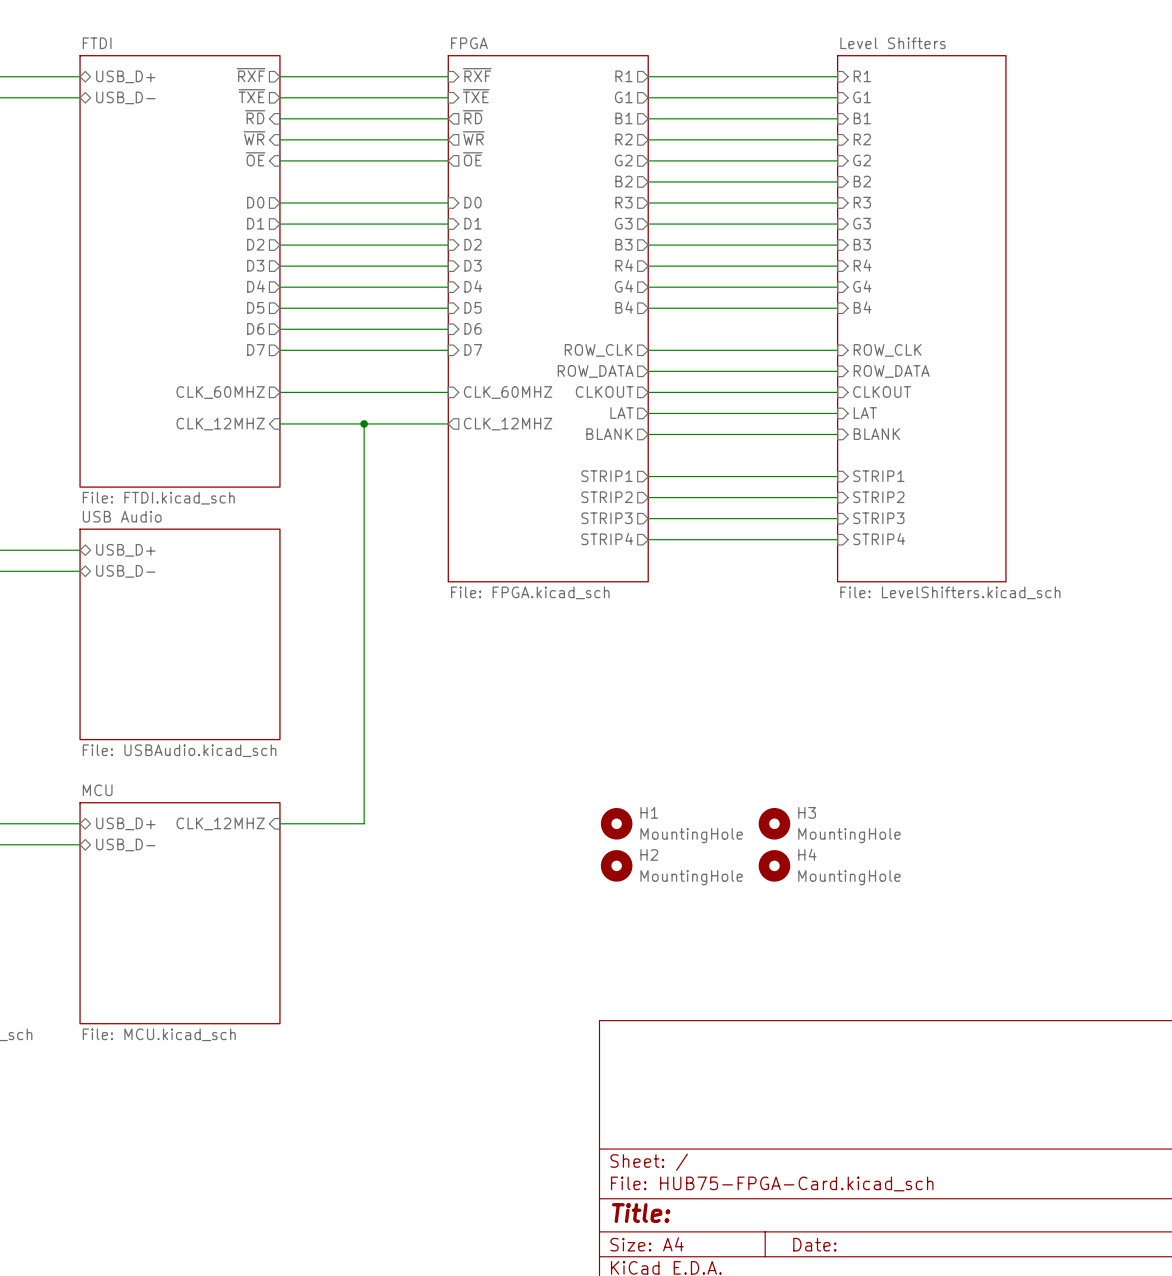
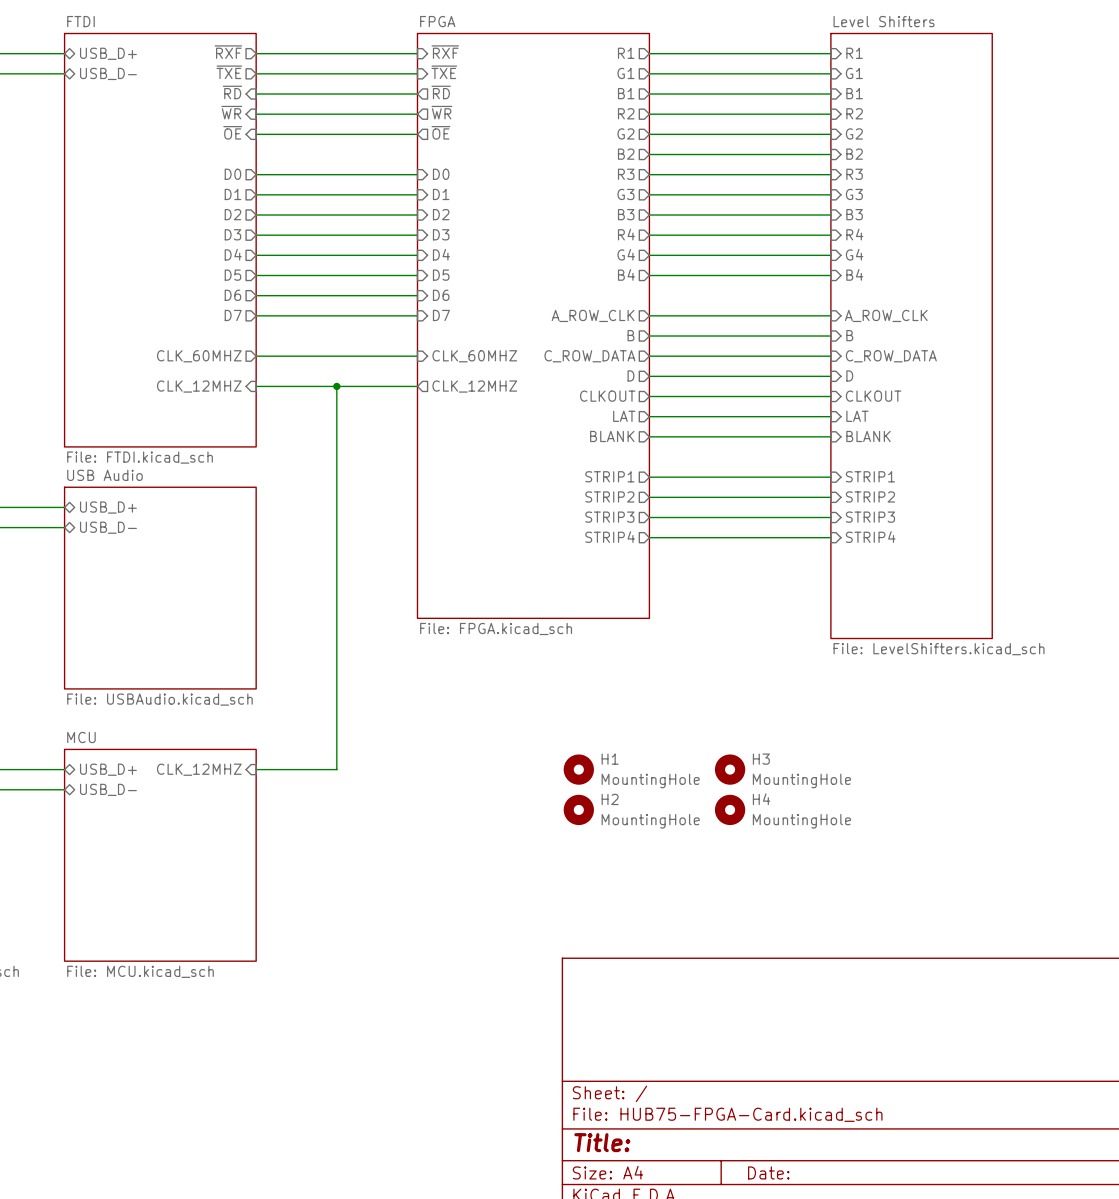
sheet pin position: R1 (624, 76) -> R1 (626, 53)
wire: (648, 76) (690, 76) -> (790, 53) (830, 53)
sheet pin position: R1 (862, 76) -> R1 (854, 53)
sheet pin position: G1 (623, 97) -> G1 (625, 73)
wire: (648, 97) (690, 97) -> (790, 73) (830, 73)
sheet pin position: G1 (862, 97) -> G1 (854, 73)
sheet pin position: B1 (624, 118) -> B1 (626, 93)
wire: (648, 118) (690, 118) -> (790, 94) (830, 94)
sheet pin position: B1 (862, 118) -> B1 (854, 93)
sheet pin position: R2 (624, 139) -> R2 (626, 113)
wire: (648, 139) (690, 139) -> (790, 114) (830, 114)
sheet pin position: R2 (862, 139) -> R2 (854, 113)
sheet pin position: G2 (623, 160) -> G2 (625, 133)
wire: (648, 160) (690, 160) -> (790, 134) (830, 134)
sheet pin position: G2 (862, 160) -> G2 (854, 133)
sheet pin position: B2 (624, 181) -> B2 (626, 154)
wire: (648, 181) (690, 181) -> (790, 154) (830, 154)
sheet pin position: B2 (862, 181) -> B2 (854, 154)
sheet pin position: R3 (624, 202) -> R3 (626, 174)
sheet pin position: R3 (862, 202) -> R3 (854, 174)
wire: (648, 203) (690, 203) -> (790, 174) (830, 174)
sheet pin position: G3 (623, 223) -> G3 (625, 194)
sheet pin position: G3 (862, 223) -> G3 (854, 194)
wire: (648, 224) (690, 224) -> (790, 194) (830, 194)
sheet pin position: B3 (624, 244) -> B3 (626, 214)
sheet pin position: B3 (862, 244) -> B3 (854, 214)
wire: (648, 245) (690, 245) -> (790, 215) (830, 215)
sheet pin position: R4 (624, 265) -> R4 (626, 234)
sheet pin position: R4 (862, 265) -> R4 (854, 234)
wire: (648, 266) (690, 266) -> (790, 235) (830, 235)
sheet pin position: G4 (624, 286) -> G4 (626, 254)
sheet pin position: G4 (862, 286) -> G4 (854, 254)
wire: (648, 287) (690, 287) -> (790, 255) (830, 255)
sheet pin position: B4 (624, 307) -> B4 (626, 274)
sheet pin position: B4 (862, 307) -> B4 (854, 274)
wire: (648, 308) (690, 308) -> (790, 275) (830, 275)
sheet FPGA: File: FPGA.kicad_sch (548, 318) -> none
sheet Level Shifters: File: LevelShifters.kicad_sch (921, 318) -> none
sheet pin: ROW_CLK (598, 350) -> A_ROW_CLK (593, 315)
wire: (648, 350) (690, 350) -> (790, 315) (830, 315)
sheet pin: ROW_CLK (887, 350) -> A_ROW_CLK (886, 315)
sheet FPGA: none -> File: FPGA.kicad_sch (533, 325)
sheet pin: none -> B (631, 335)
sheet pin: none -> B (849, 335)
sheet pin: ROW_DATA (595, 371) -> C_ROW_DATA (589, 356)
wire: (648, 371) (690, 371) -> (790, 336) (830, 336)
sheet pin: ROW_DATA (891, 371) -> C_ROW_DATA (891, 356)
sheet Level Shifters: none -> File: LevelShifters.kicad_sch (911, 336)
sheet pin position: CLKOUT (604, 392) -> CLKOUT (607, 396)
wire: (648, 392) (690, 392) -> (790, 356) (830, 356)
sheet pin position: CLKOUT (882, 392) -> CLKOUT (873, 396)
sheet pin position: LAT (621, 413) -> LAT (624, 416)
wire: (648, 413) (690, 413) -> (790, 376) (830, 376)
sheet pin: none -> D (631, 375)
sheet pin position: LAT (865, 413) -> LAT (857, 416)
sheet pin: none -> D (849, 375)
sheet pin position: BLANK (609, 434) -> BLANK (612, 436)
wire: (648, 434) (690, 434) -> (790, 396) (830, 396)
sheet pin position: BLANK (876, 434) -> BLANK (868, 436)
sheet pin position: STRIP1 (606, 476) -> STRIP1 (609, 476)
wire: (648, 476) (690, 476) -> (790, 436) (830, 436)
sheet pin position: STRIP1 (878, 476) -> STRIP1 (870, 476)
sheet pin position: STRIP2 (606, 497) -> STRIP2 (609, 496)
wire: (648, 497) (837, 497) -> (649, 416) (830, 416)
sheet pin position: STRIP2 (878, 497) -> STRIP2 (870, 496)
sheet pin position: STRIP3 (606, 518) -> STRIP3 (609, 517)
wire: (648, 518) (690, 518) -> (790, 477) (830, 477)
sheet pin position: STRIP3 (878, 518) -> STRIP3 (870, 517)
sheet pin position: STRIP4 (607, 539) -> STRIP4 (610, 537)
wire: (648, 539) (690, 539) -> (790, 497) (830, 497)
sheet pin position: STRIP4 (879, 539) -> STRIP4 (870, 537)
wire: none -> (649, 517) (830, 517)
wire: none -> (649, 537) (830, 537)

